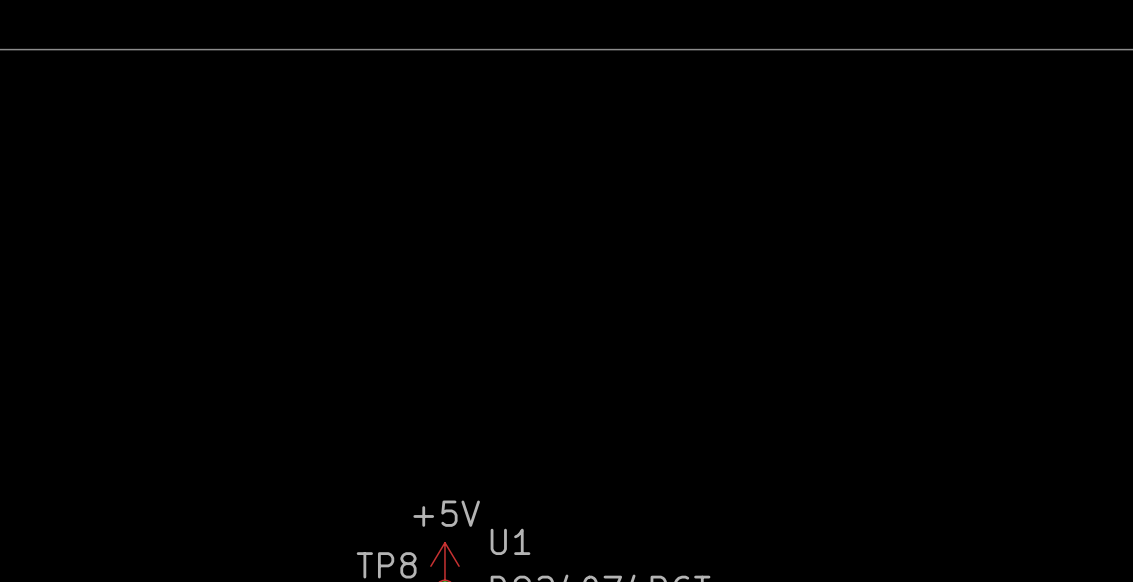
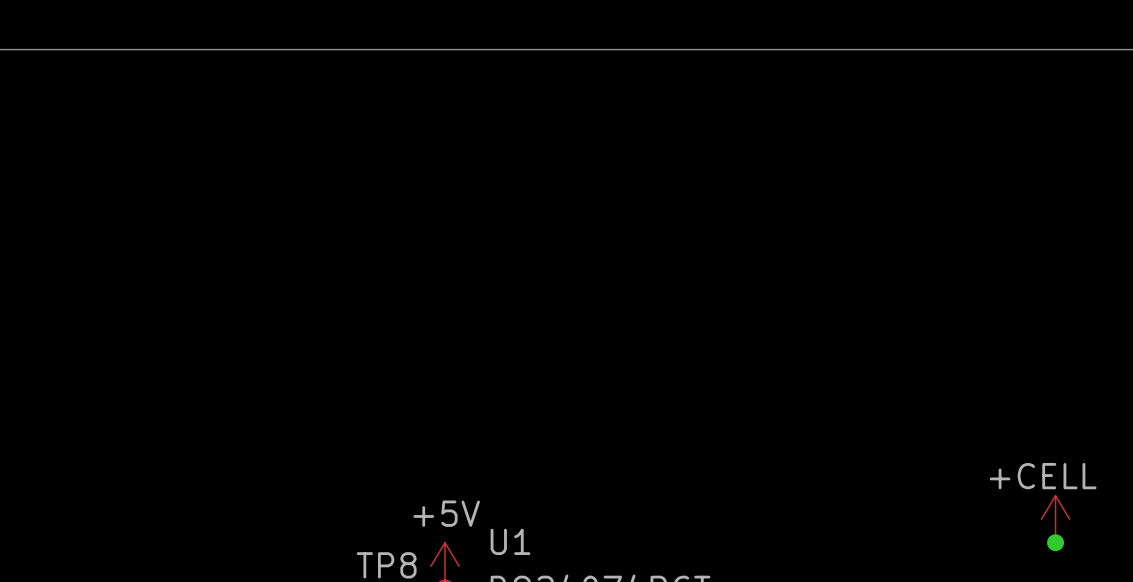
power symbol: none -> +CELL (1055, 519)
junction: none -> (1055, 542)

